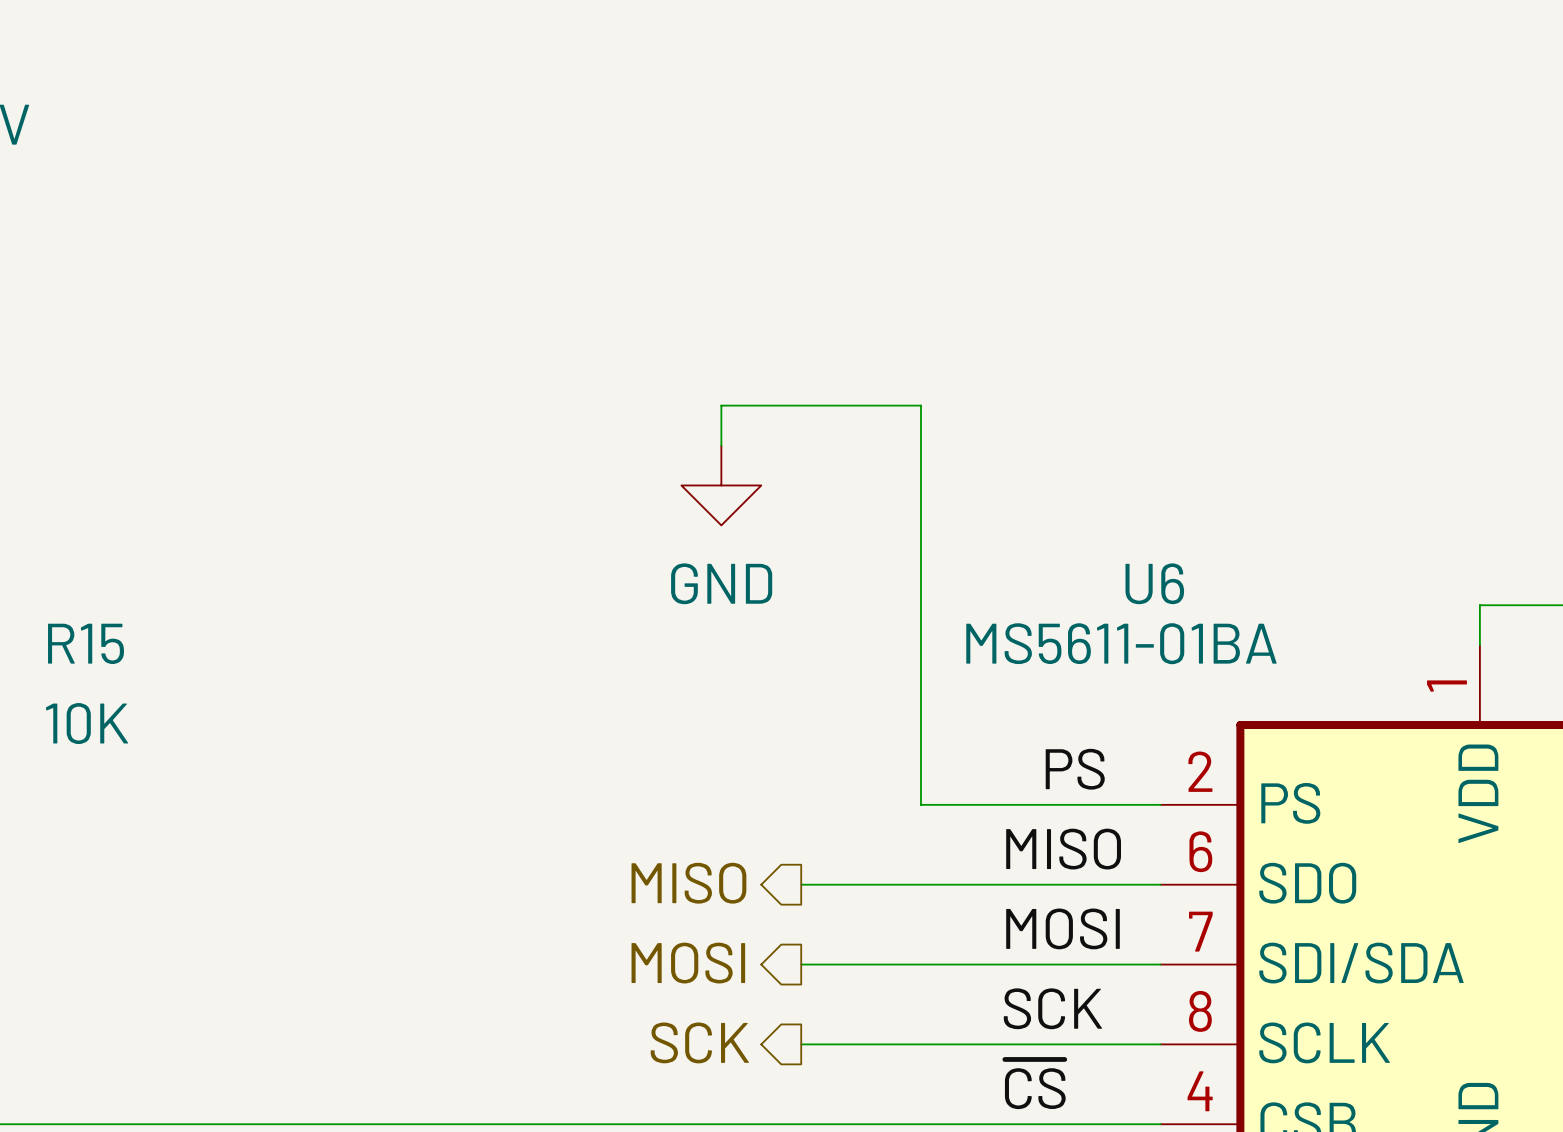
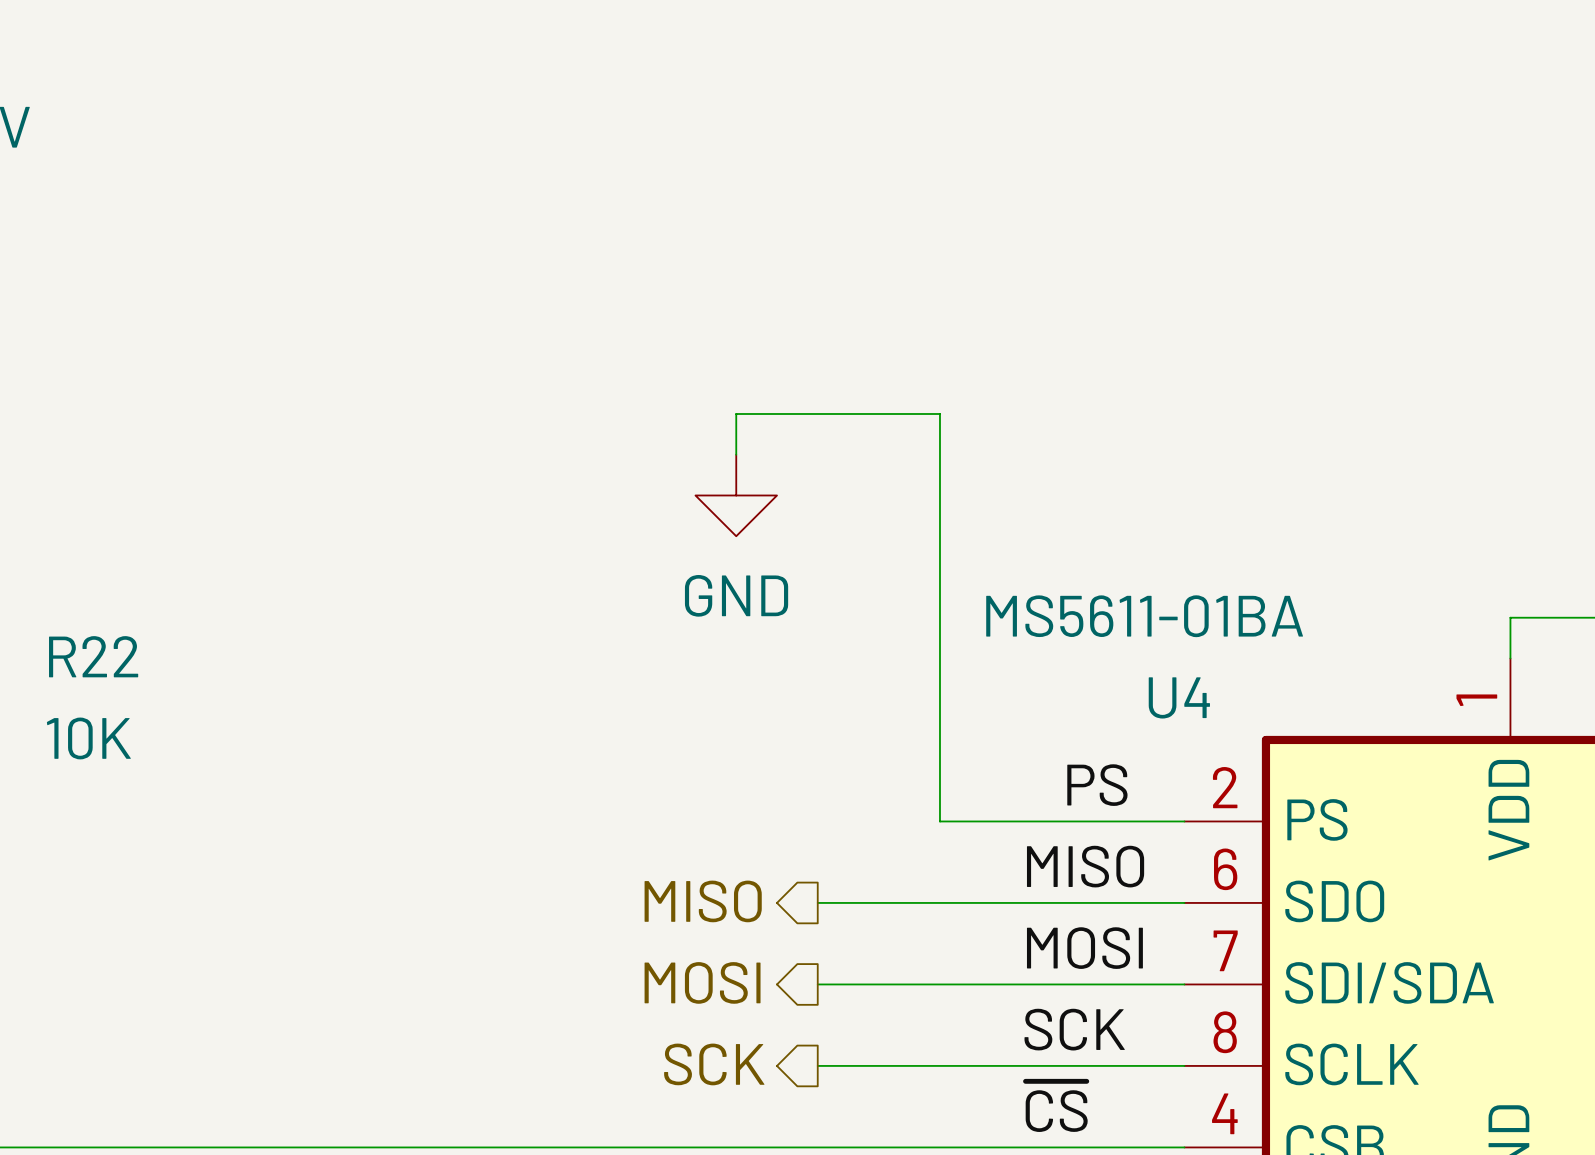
U6 name: U6 (1154, 583) -> U4 (1179, 697)
R15 name: R15 (86, 643) -> R22 (93, 656)
U6 value position: MS5611-01BA (1121, 643) -> MS5611-01BA (1144, 616)

